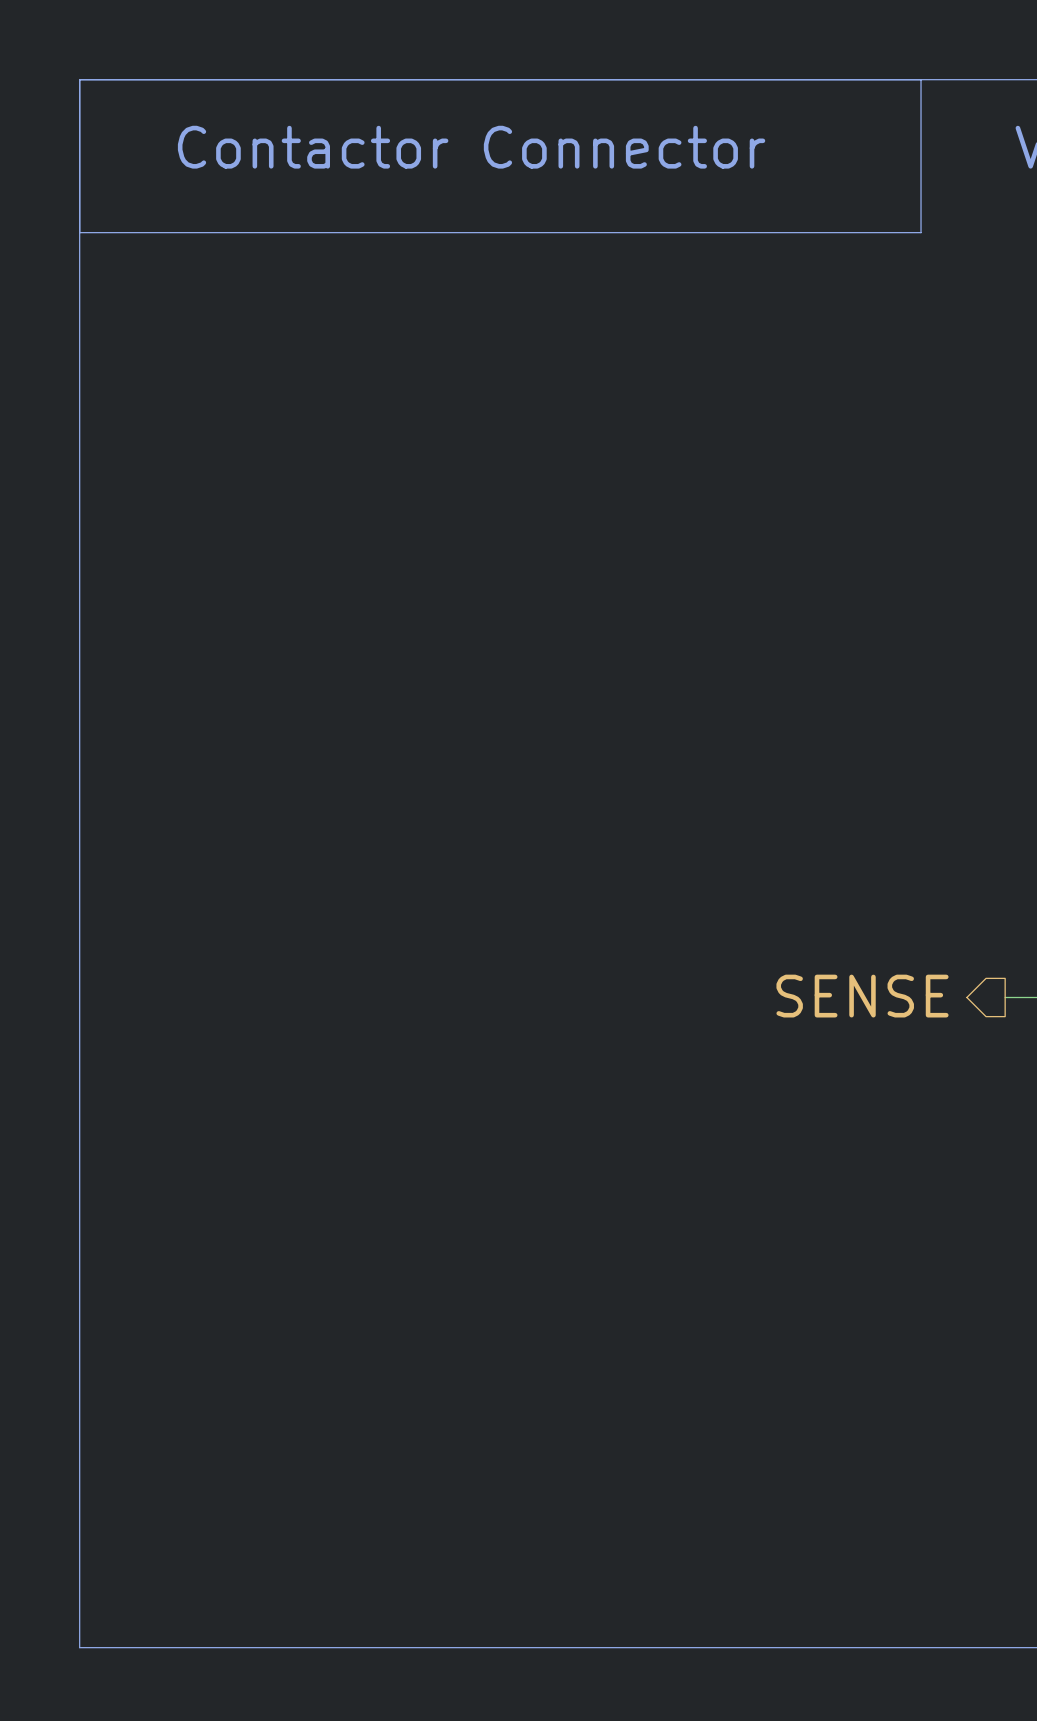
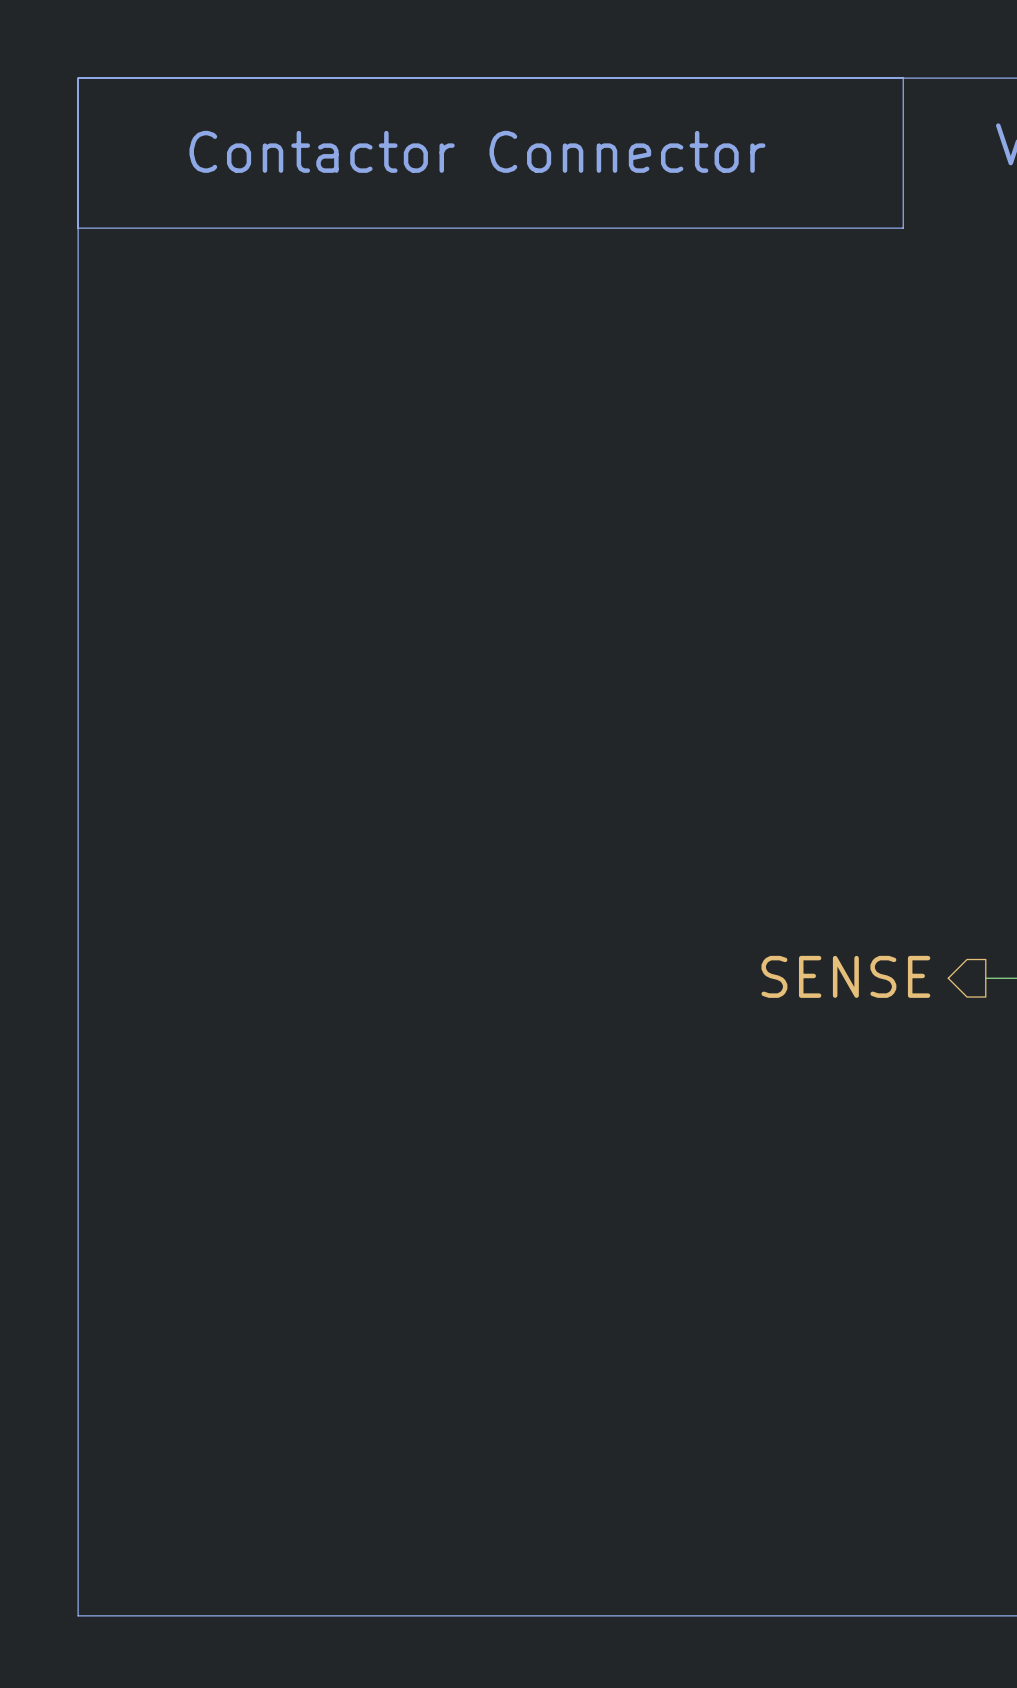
text position: Contactor Connector (471, 147) -> Contactor Connector (477, 151)

